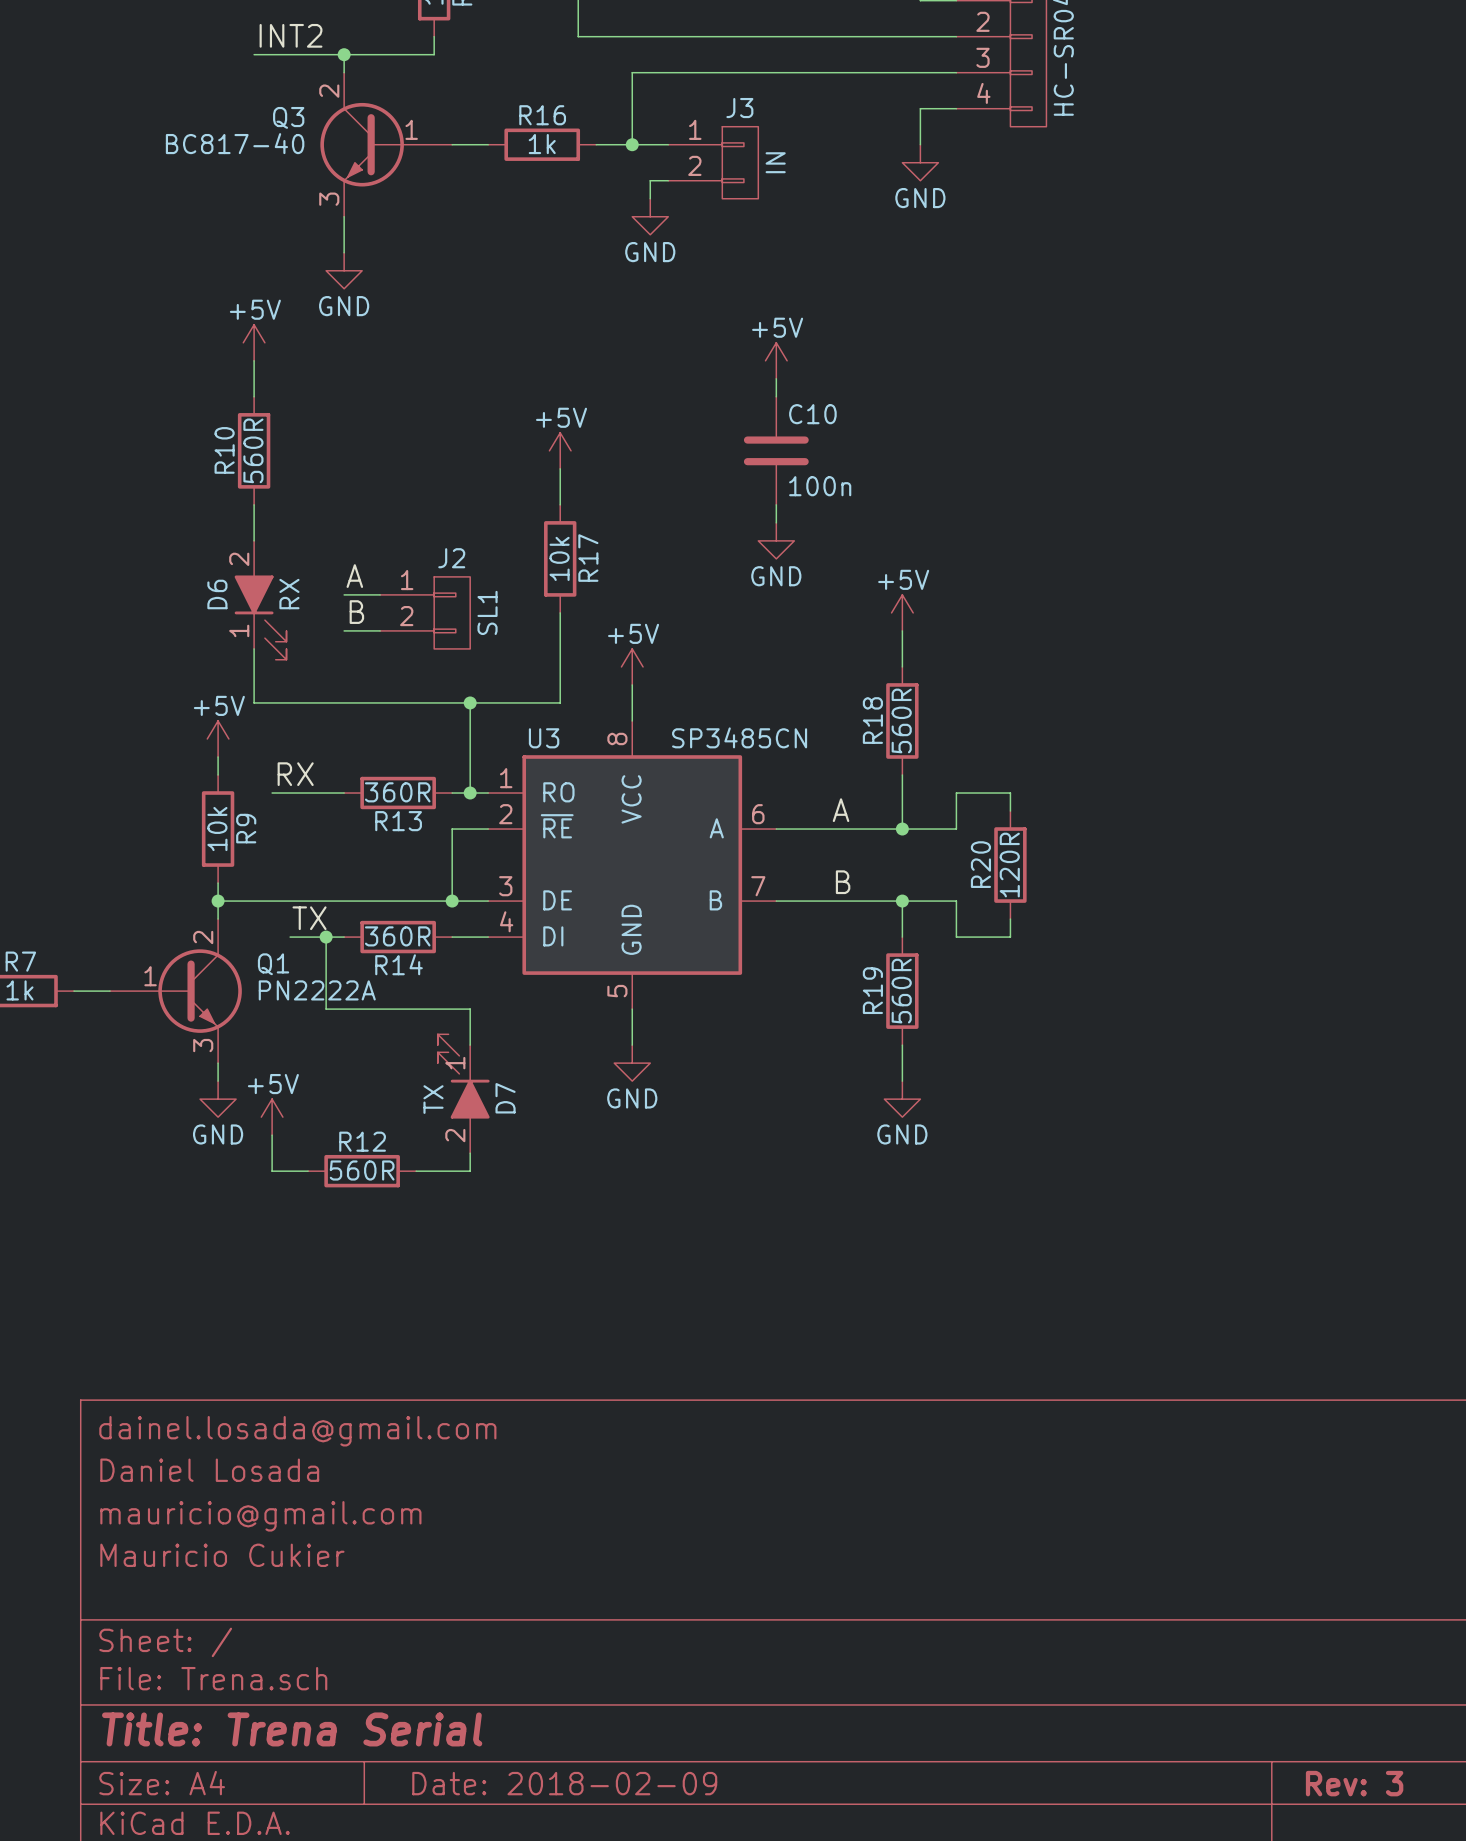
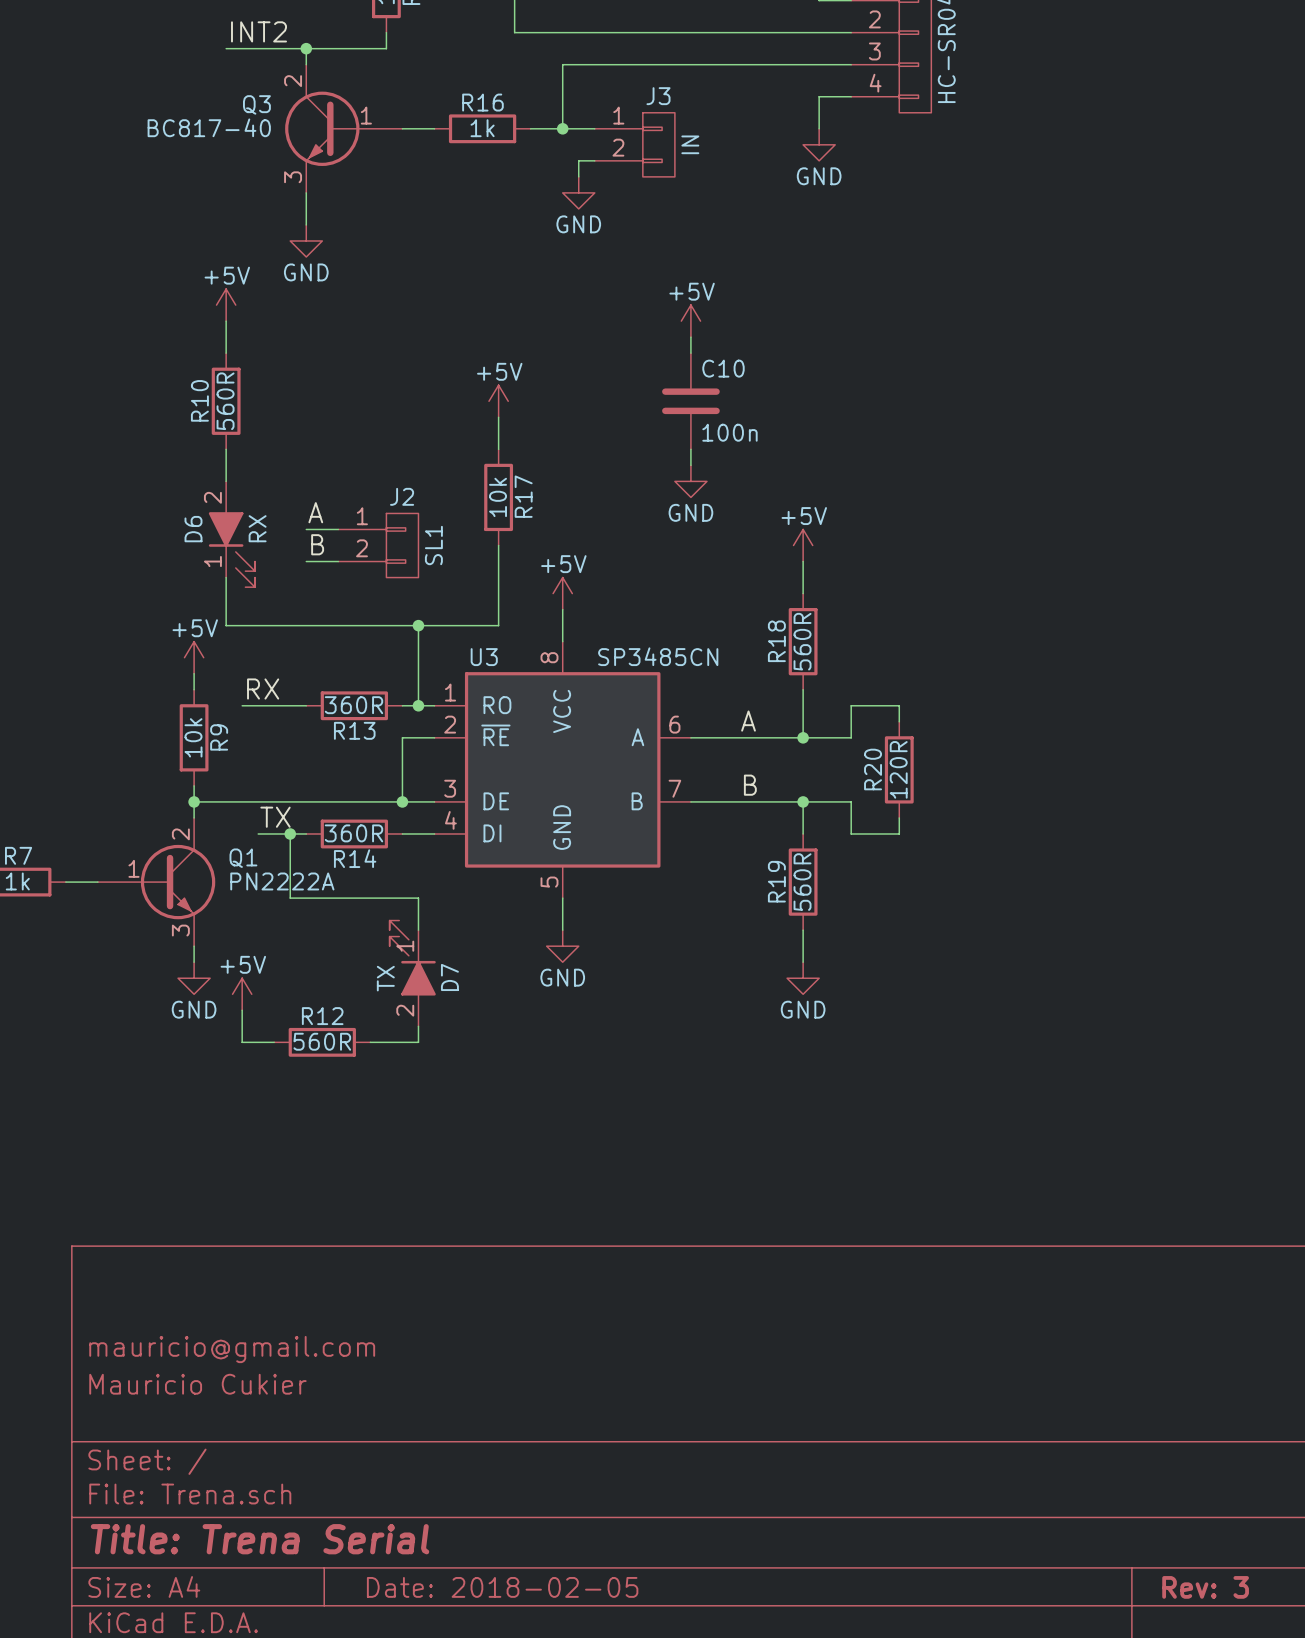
title block: dainel.losada@gmail.com (297, 1431) -> none
title block: Daniel Losada (209, 1470) -> none
title block: Date: 2018-02-09 (564, 1783) -> Date: 2018-02-05 (502, 1587)

